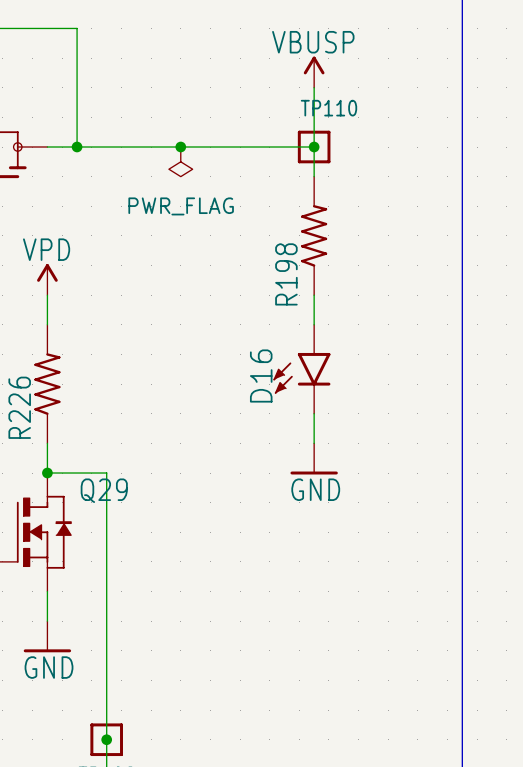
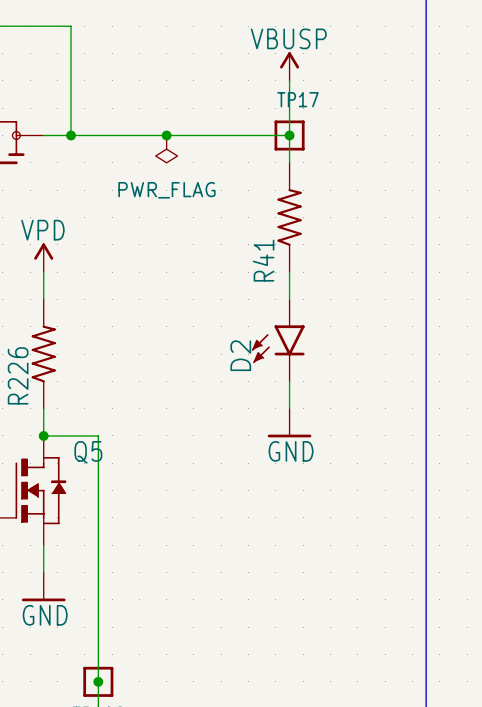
TP110 name: TP110 (328, 108) -> TP17 (297, 99)
R198 name: R198 (286, 274) -> R41 (263, 260)
D16 name: D16 (261, 376) -> D2 (240, 355)
Q29 name: Q29 (104, 490) -> Q5 (88, 452)

